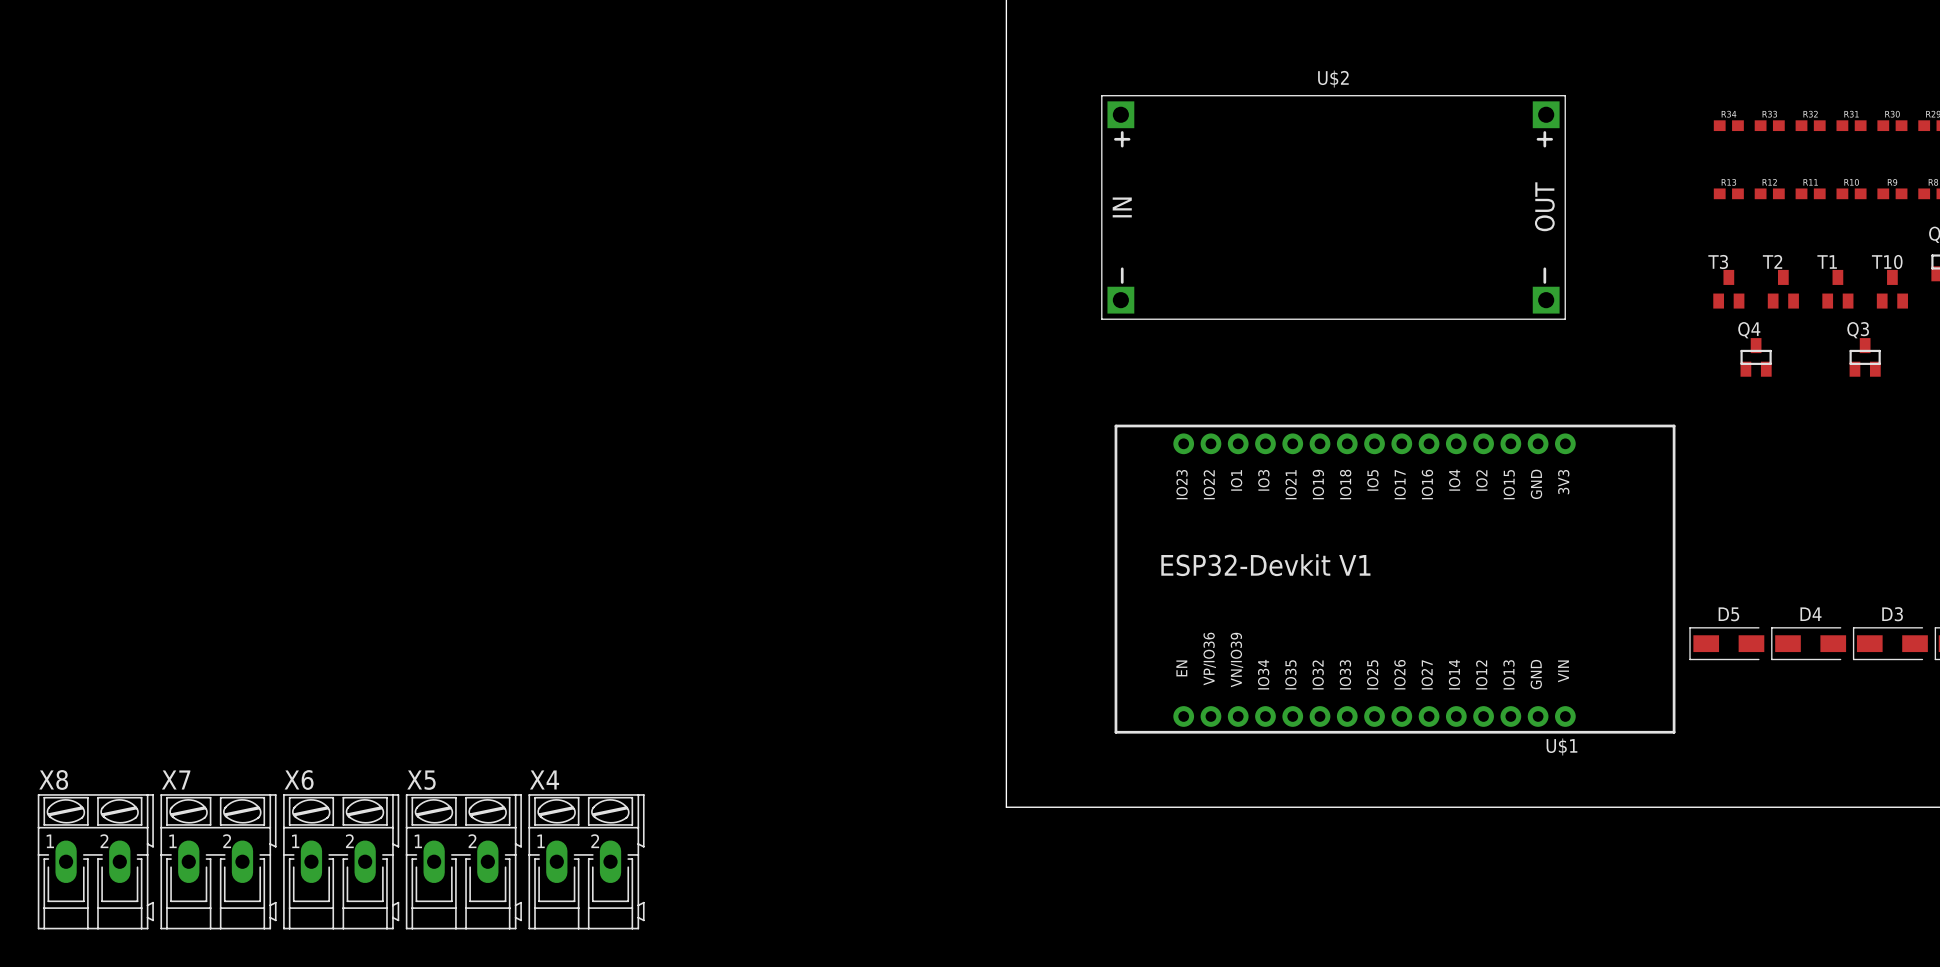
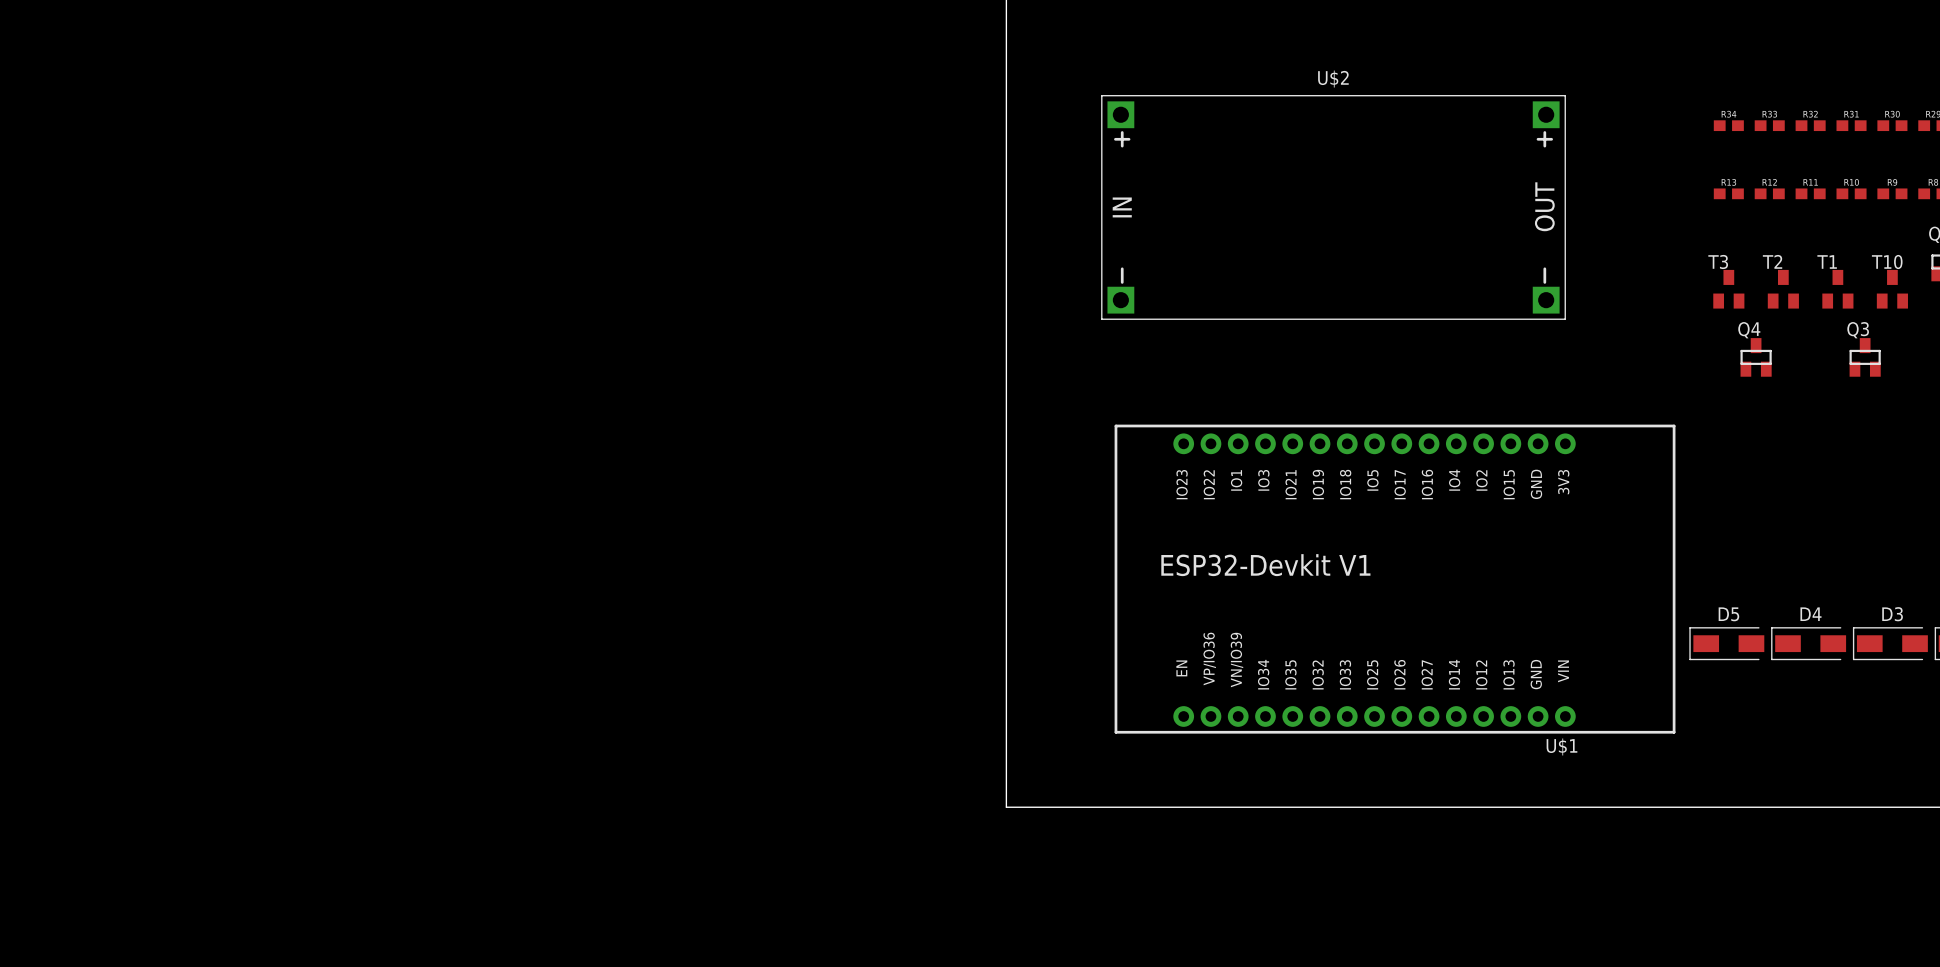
X8: (95, 861) -> none
X7: (218, 861) -> none
X6: (341, 861) -> none
X5: (463, 861) -> none
X4: (586, 861) -> none

